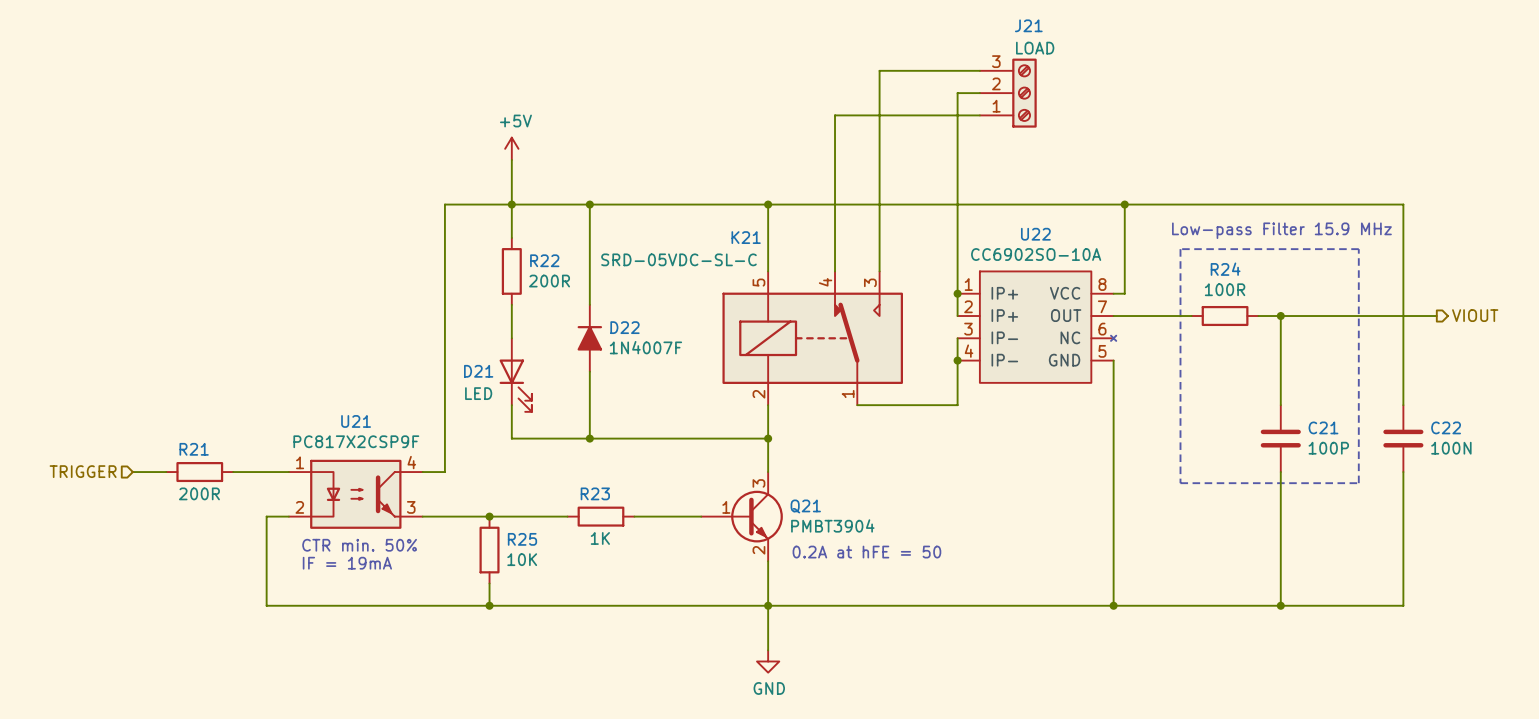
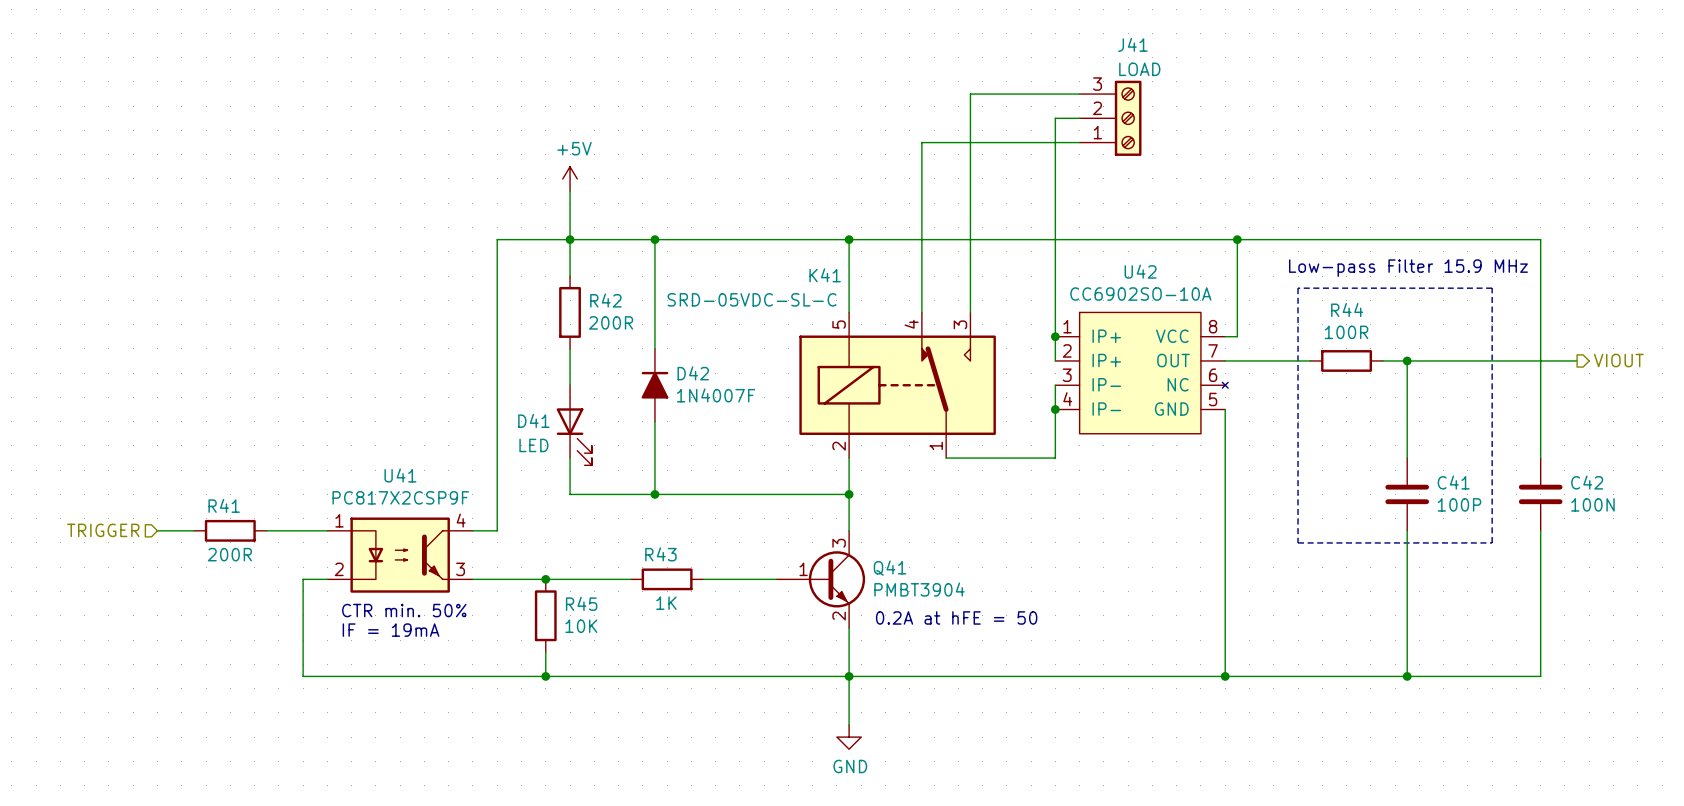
J21 name: J21 (1028, 25) -> J41 (1132, 44)
U22 name: U22 (1035, 234) -> U42 (1140, 271)
K21 name: K21 (746, 237) -> K41 (825, 275)
R22 name: R22 (544, 260) -> R42 (605, 300)
R24 name: R24 (1225, 269) -> R44 (1347, 310)
D22 name: D22 (624, 327) -> D42 (693, 373)
D21 name: D21 (478, 371) -> D41 (533, 420)
U21 name: U21 (356, 421) -> U41 (400, 475)
C21 name: C21 (1323, 427) -> C41 (1453, 482)
C22 name: C22 (1446, 427) -> C42 (1587, 482)
R21 name: R21 (194, 449) -> R41 (224, 505)
R23 name: R23 (595, 493) -> R43 (660, 554)
Q21 name: Q21 (805, 506) -> Q41 (890, 568)
R25 name: R25 (522, 539) -> R45 (581, 603)

